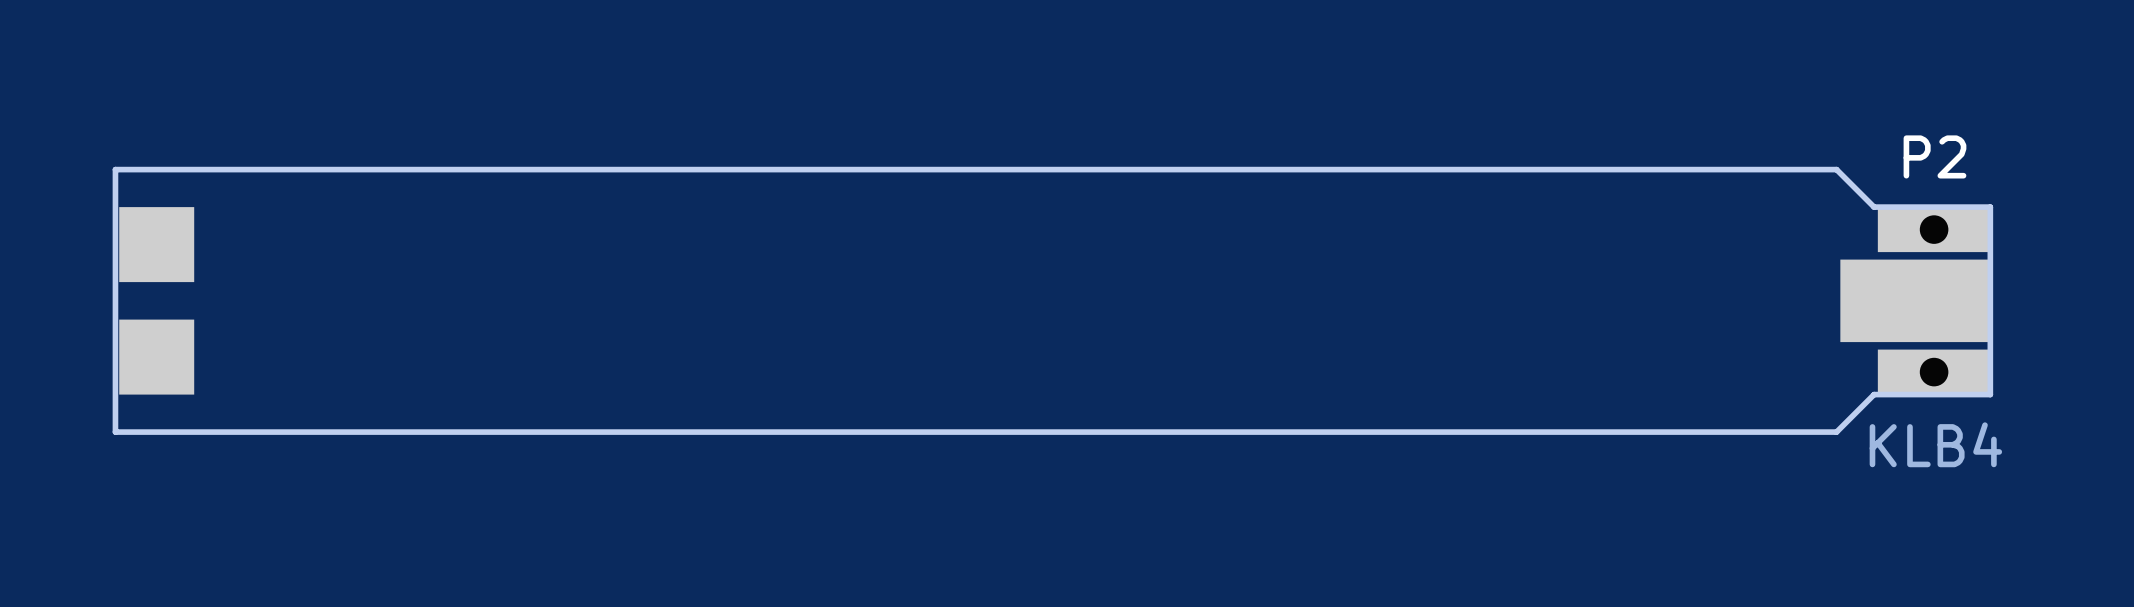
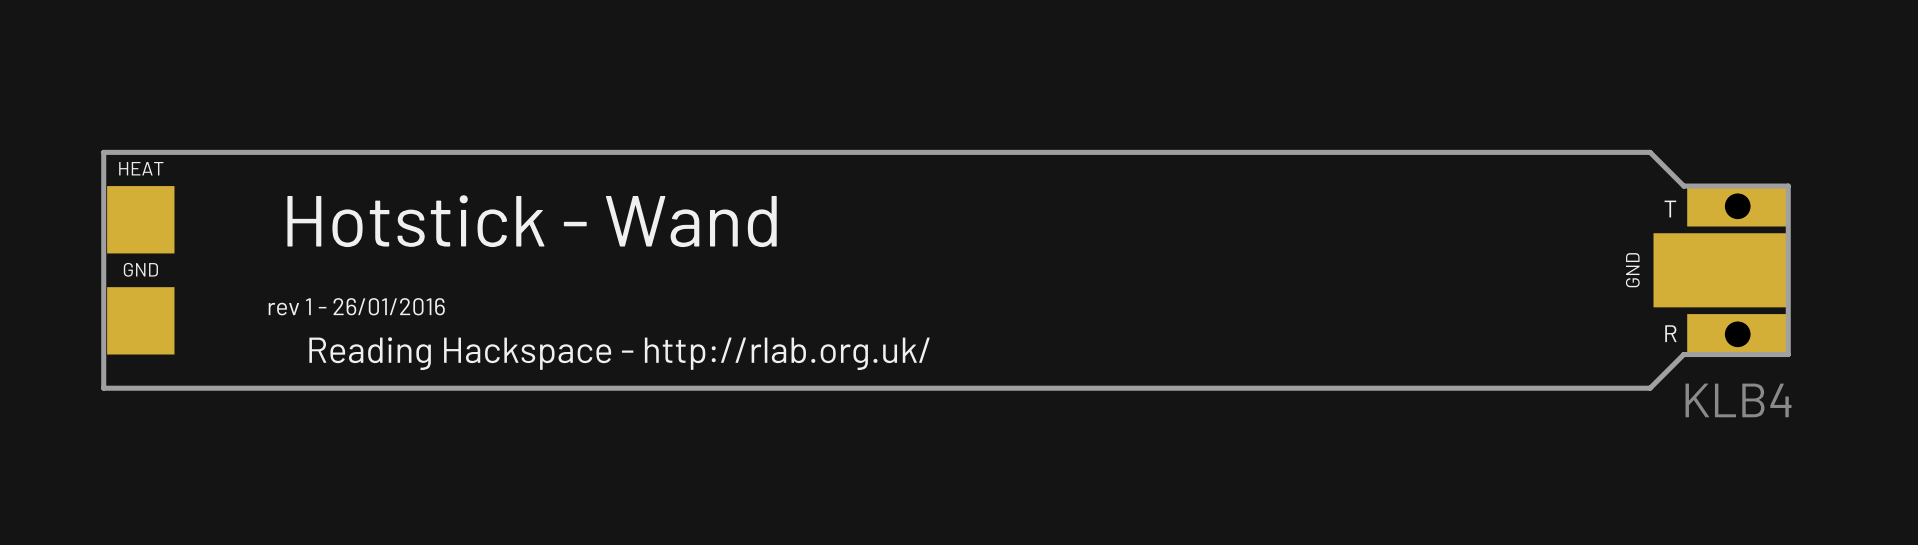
P2 name: P2 (1934, 156) -> none
text: none -> HEAT (141, 168)
text: none -> T (1670, 209)
text: none -> Hotstick - Wand (532, 221)
text: none -> GND (140, 269)
text: none -> GND (1632, 270)
text: none -> rev 1 - 26/01/2016 (356, 306)
text: none -> R (1670, 333)
text: none -> Reading Hackspace - http://rlab.org.uk/ (619, 353)

